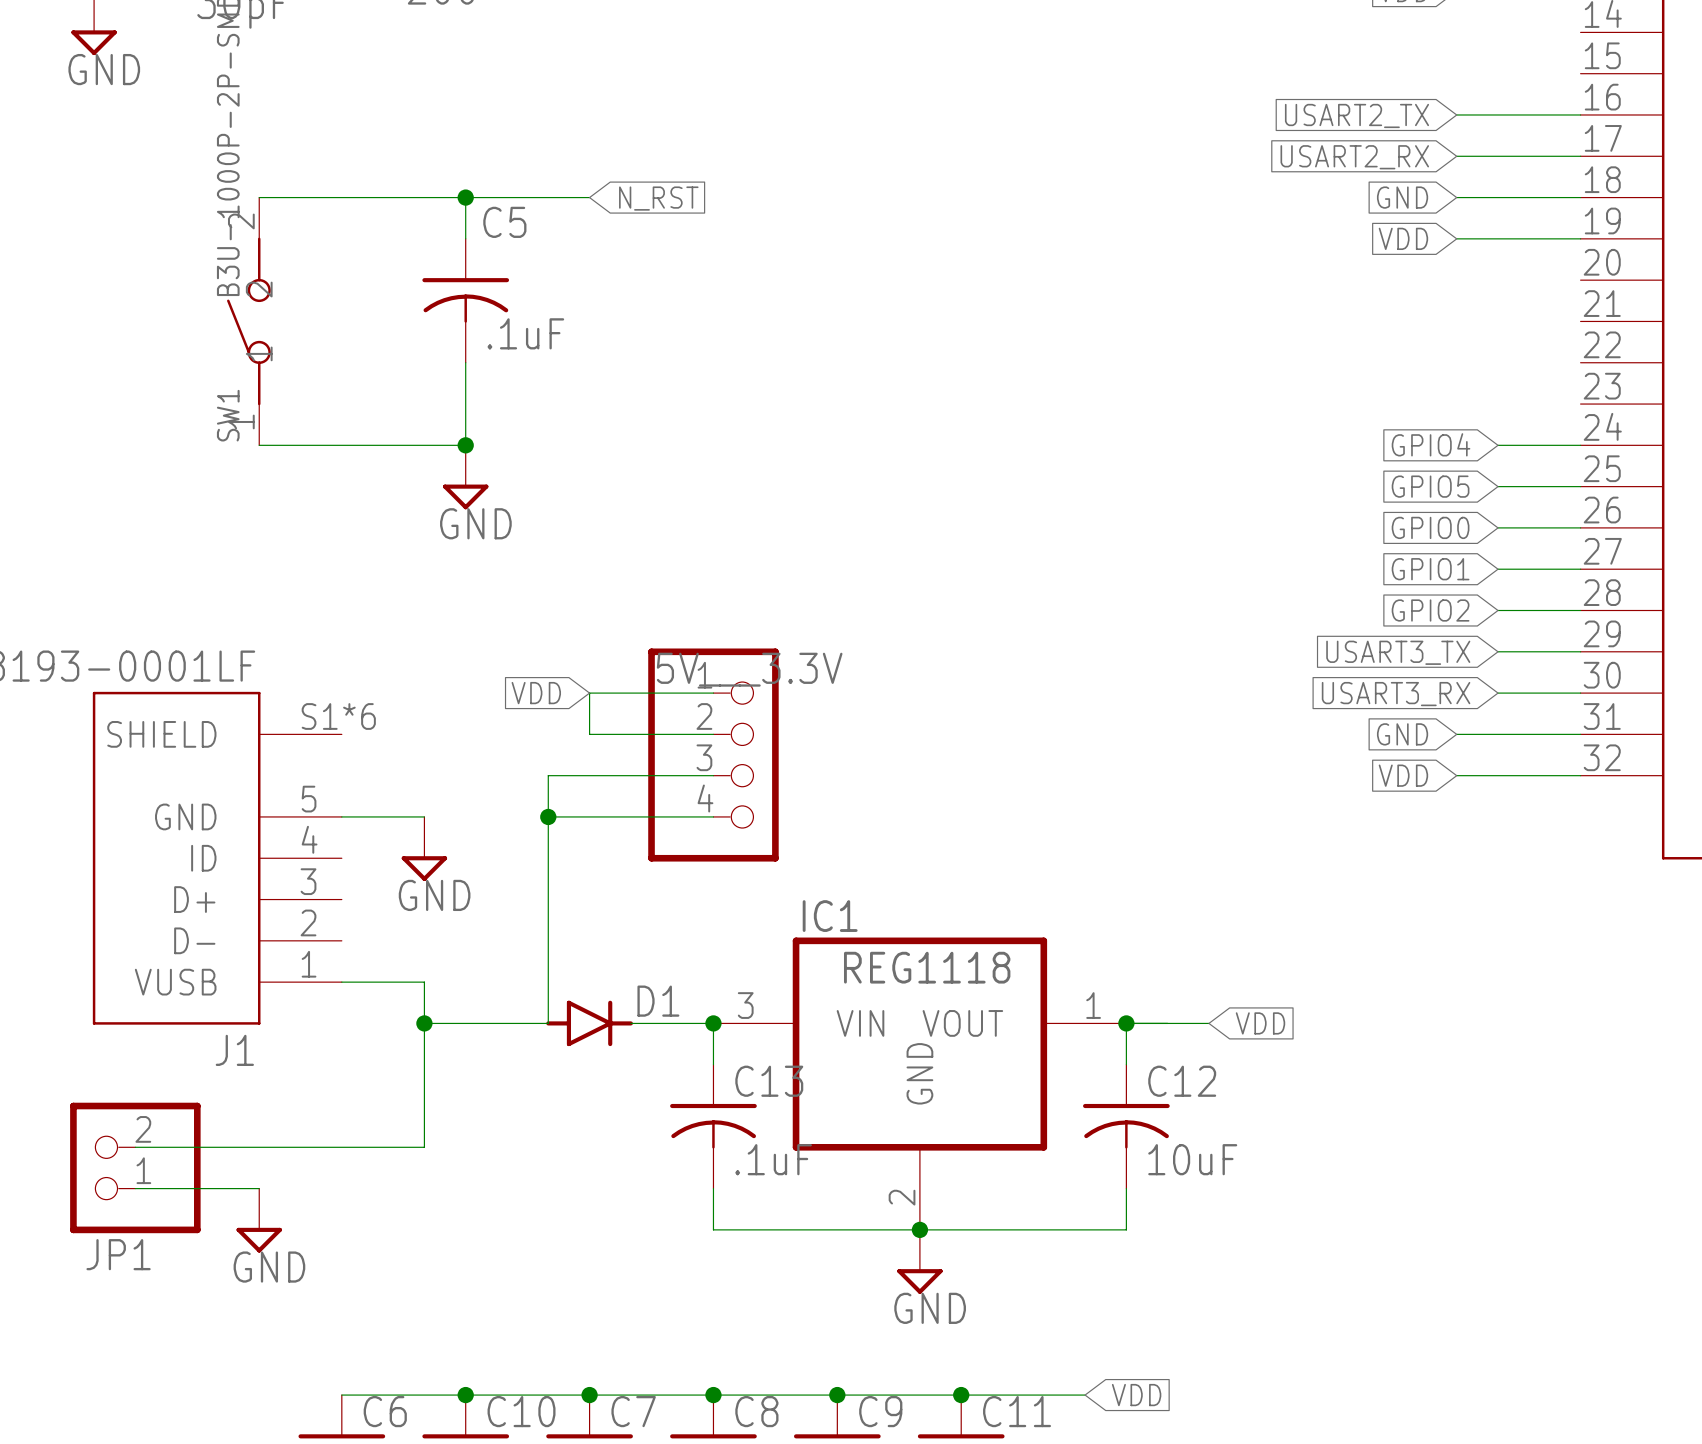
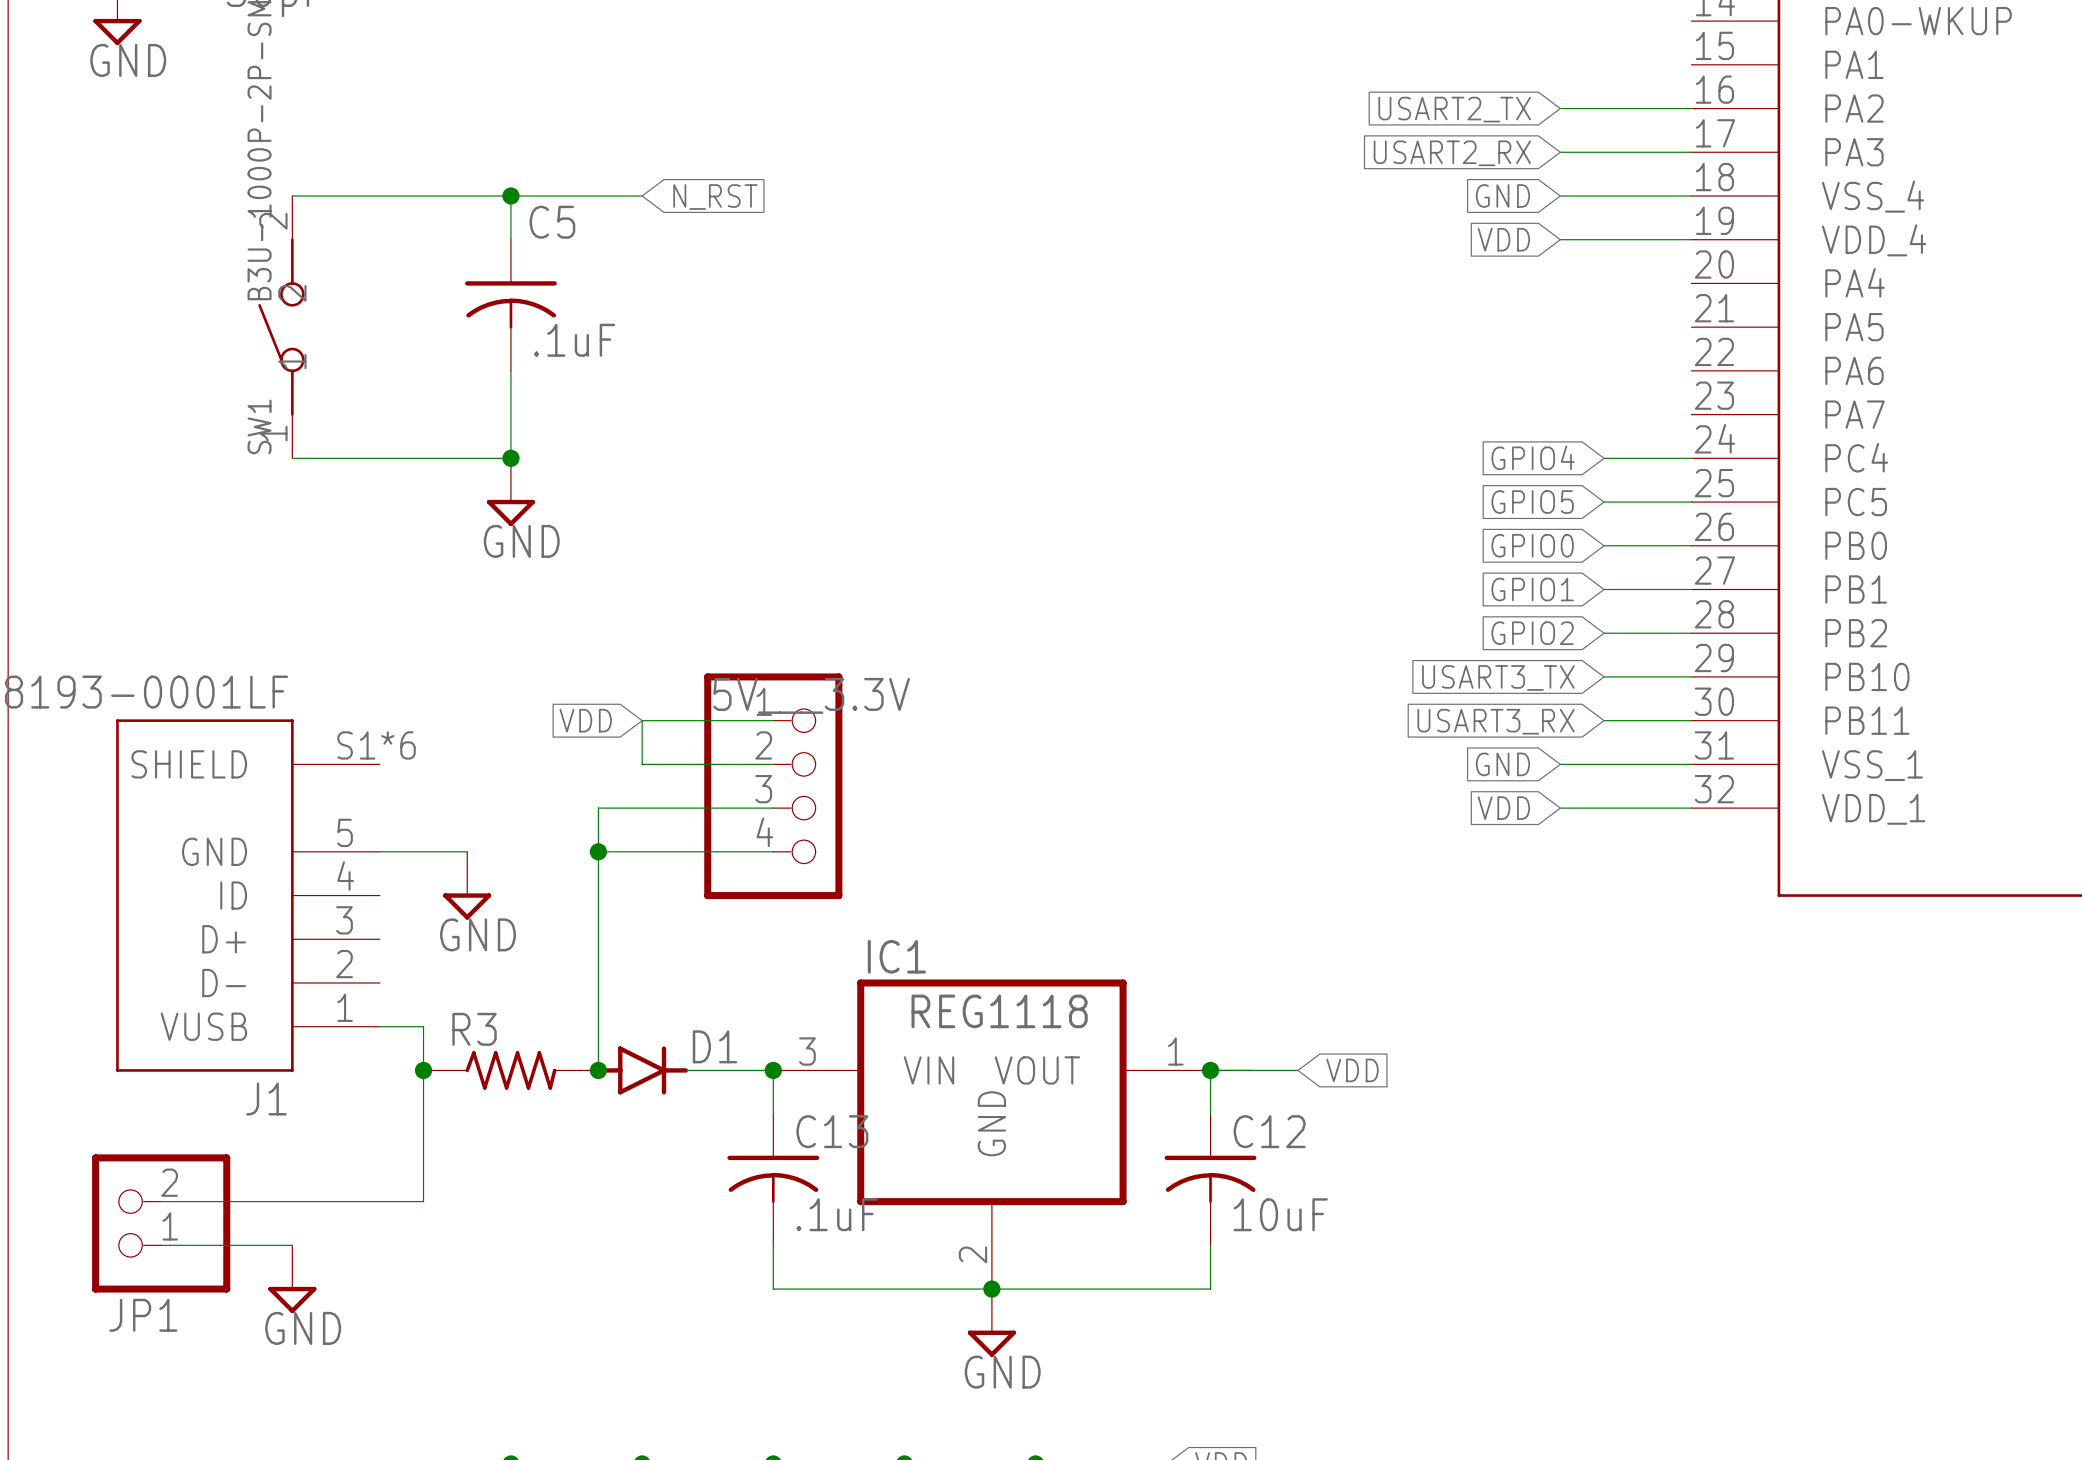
wire: (383, 982) (424, 982) (424, 1147) (383, 1147) -> (423, 1026) (423, 1201)
junction position: (424, 1023) -> (423, 1070)
R3: none -> (510, 1070)
junction: none -> (598, 1070)

